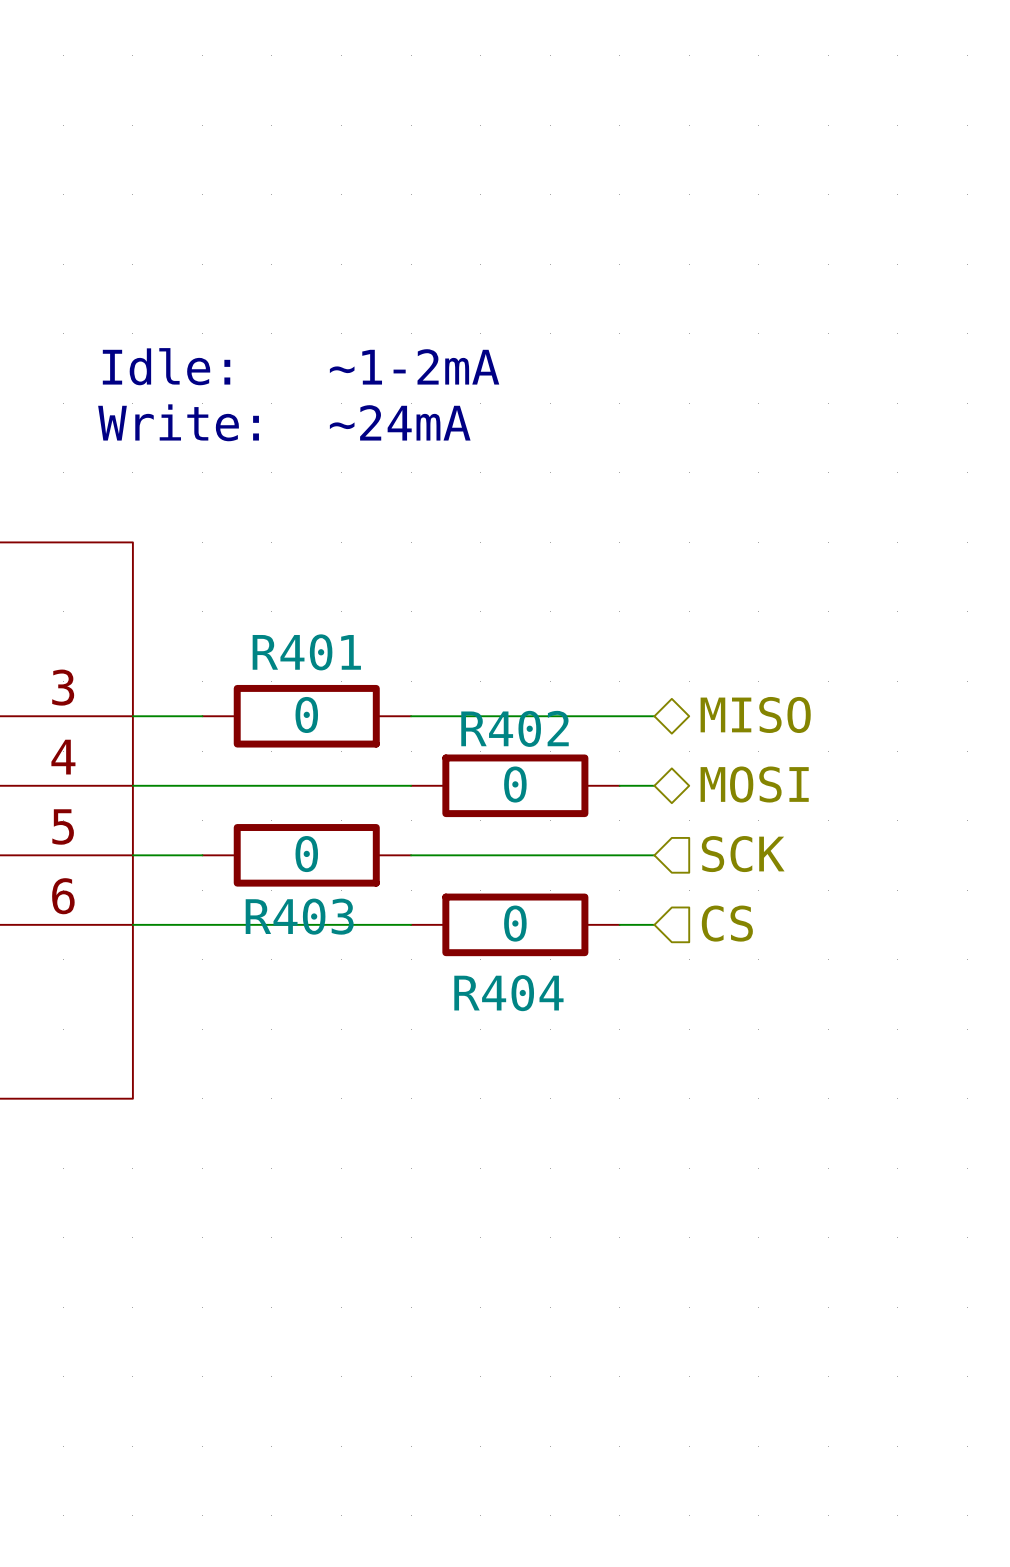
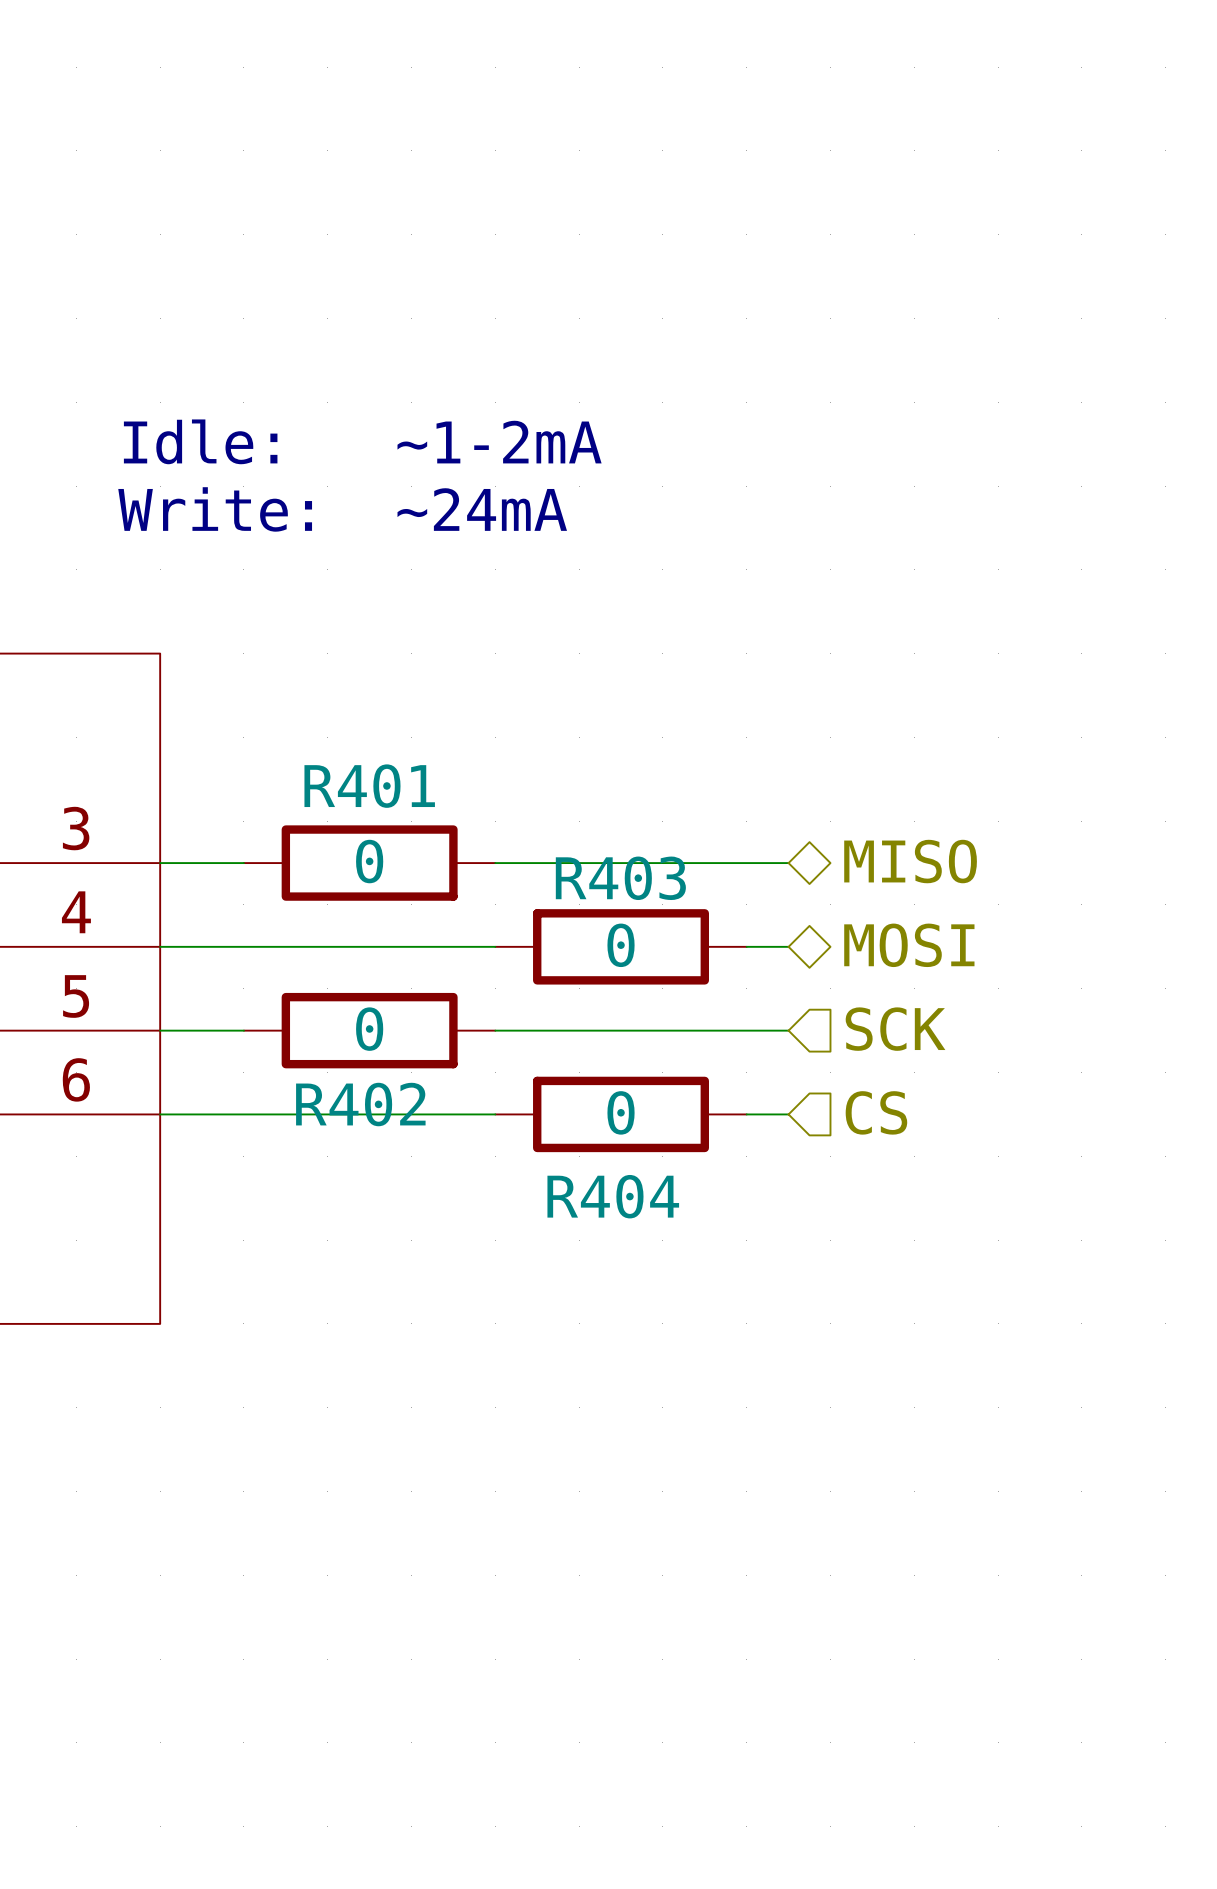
R402 name: R402 (515, 728) -> R403 (620, 878)
R403 name: R403 (299, 916) -> R402 (360, 1104)

